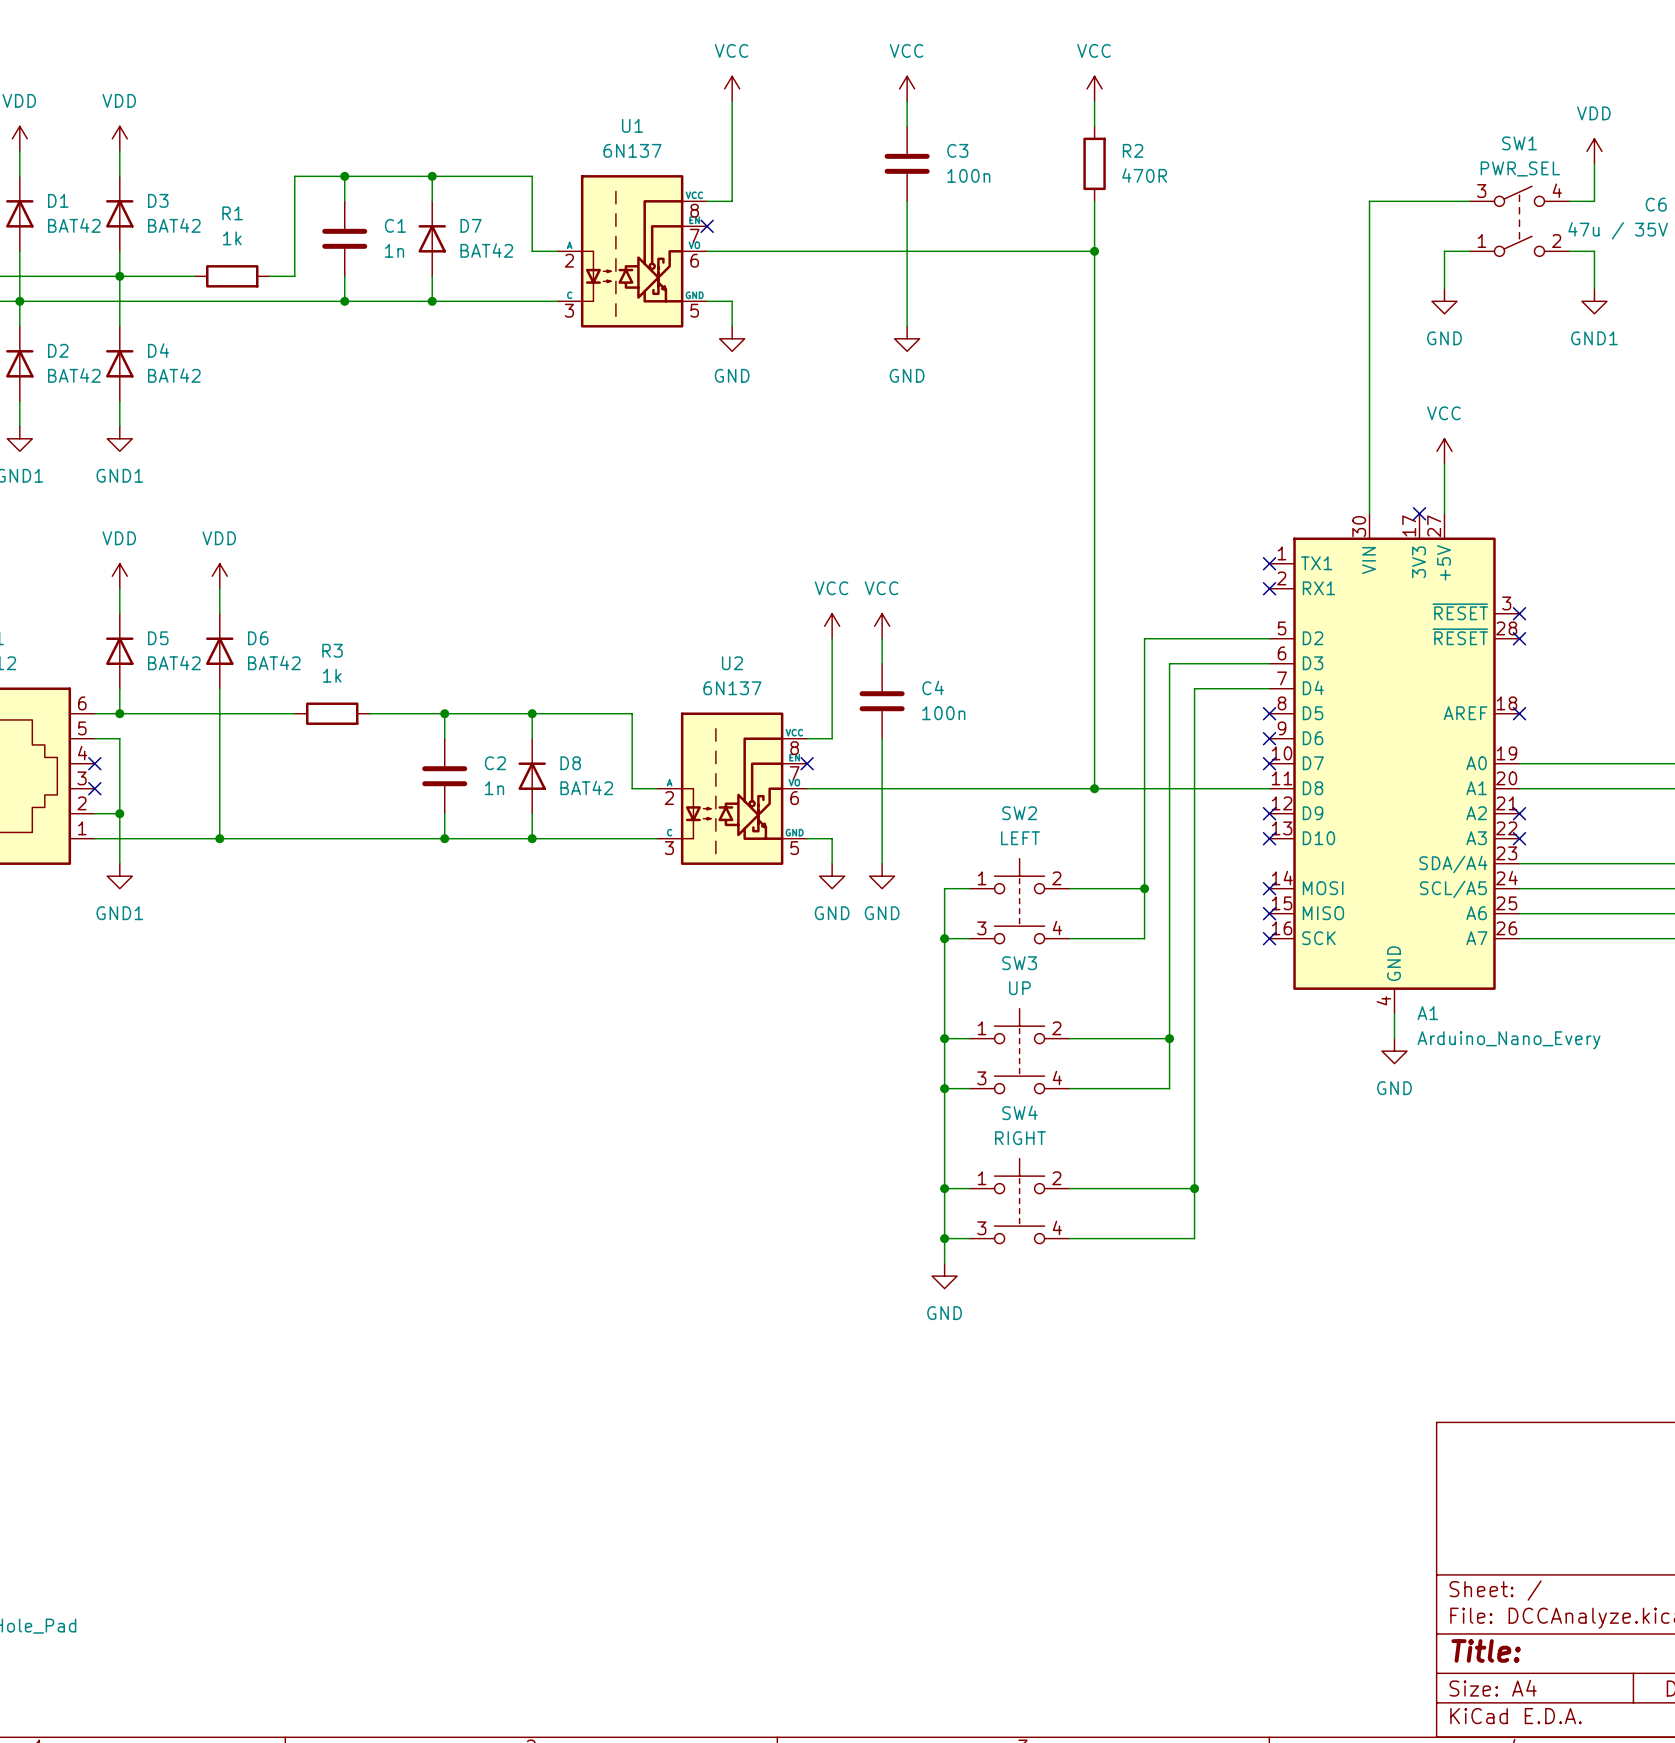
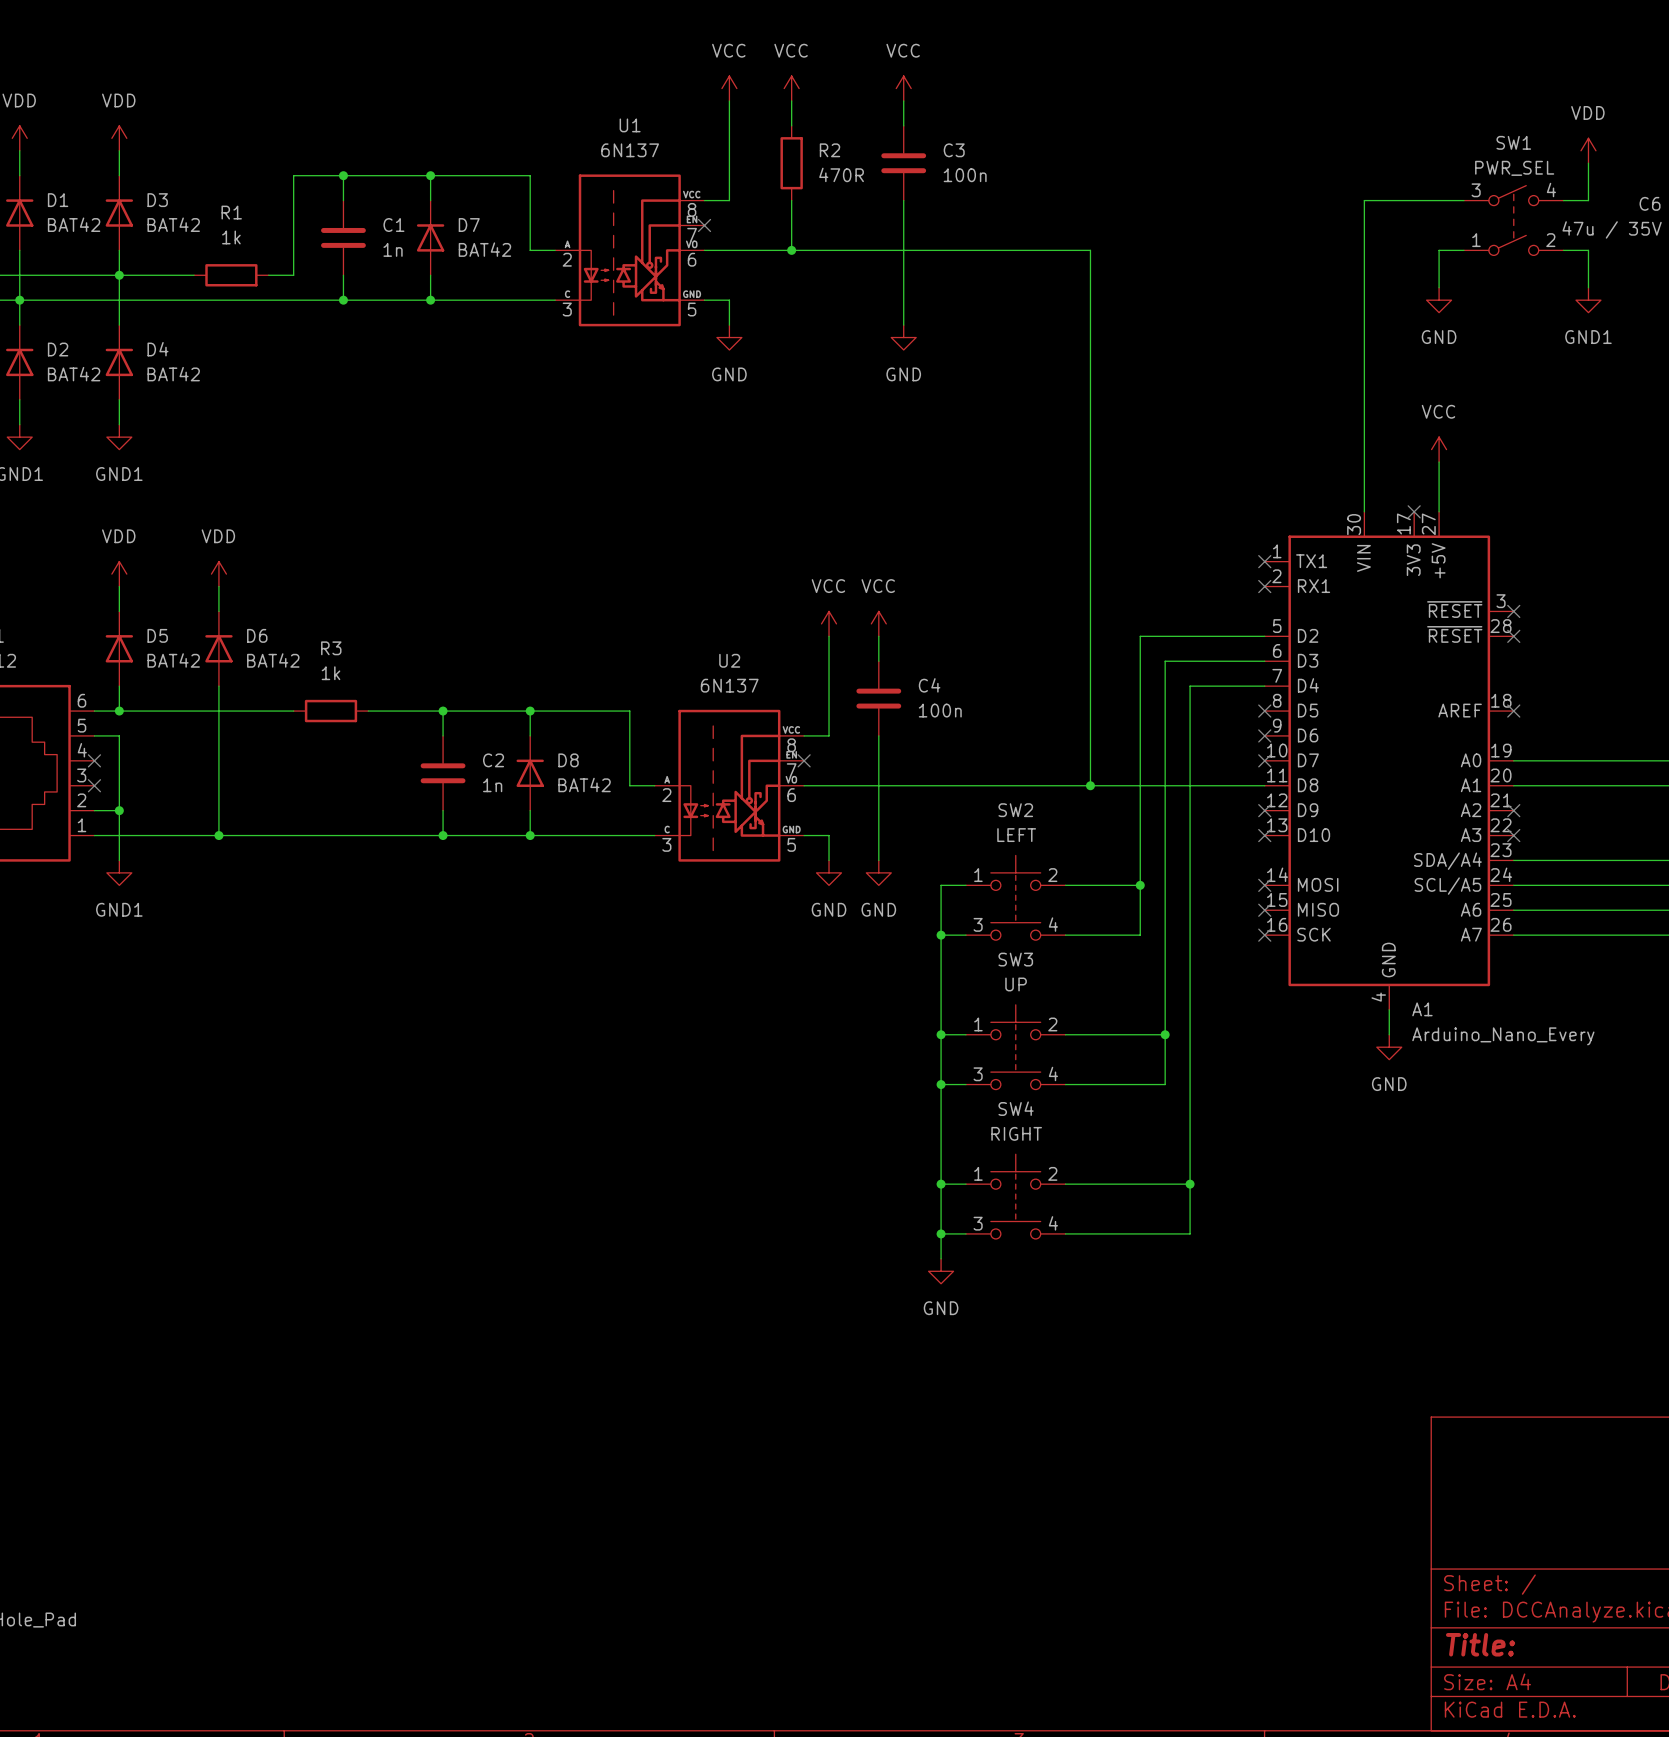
power symbol: none -> VCC (791, 88)
power symbol: VCC (1094, 88) -> none
wire: none -> (791, 100) (791, 125)
wire: (1094, 101) (1094, 126) -> none
R2 position: (1094, 163) -> (791, 163)
wire: none -> (791, 200) (791, 250)
wire: (1094, 201) (1094, 251) -> none
junction: none -> (791, 250)
junction: (1094, 251) -> none

